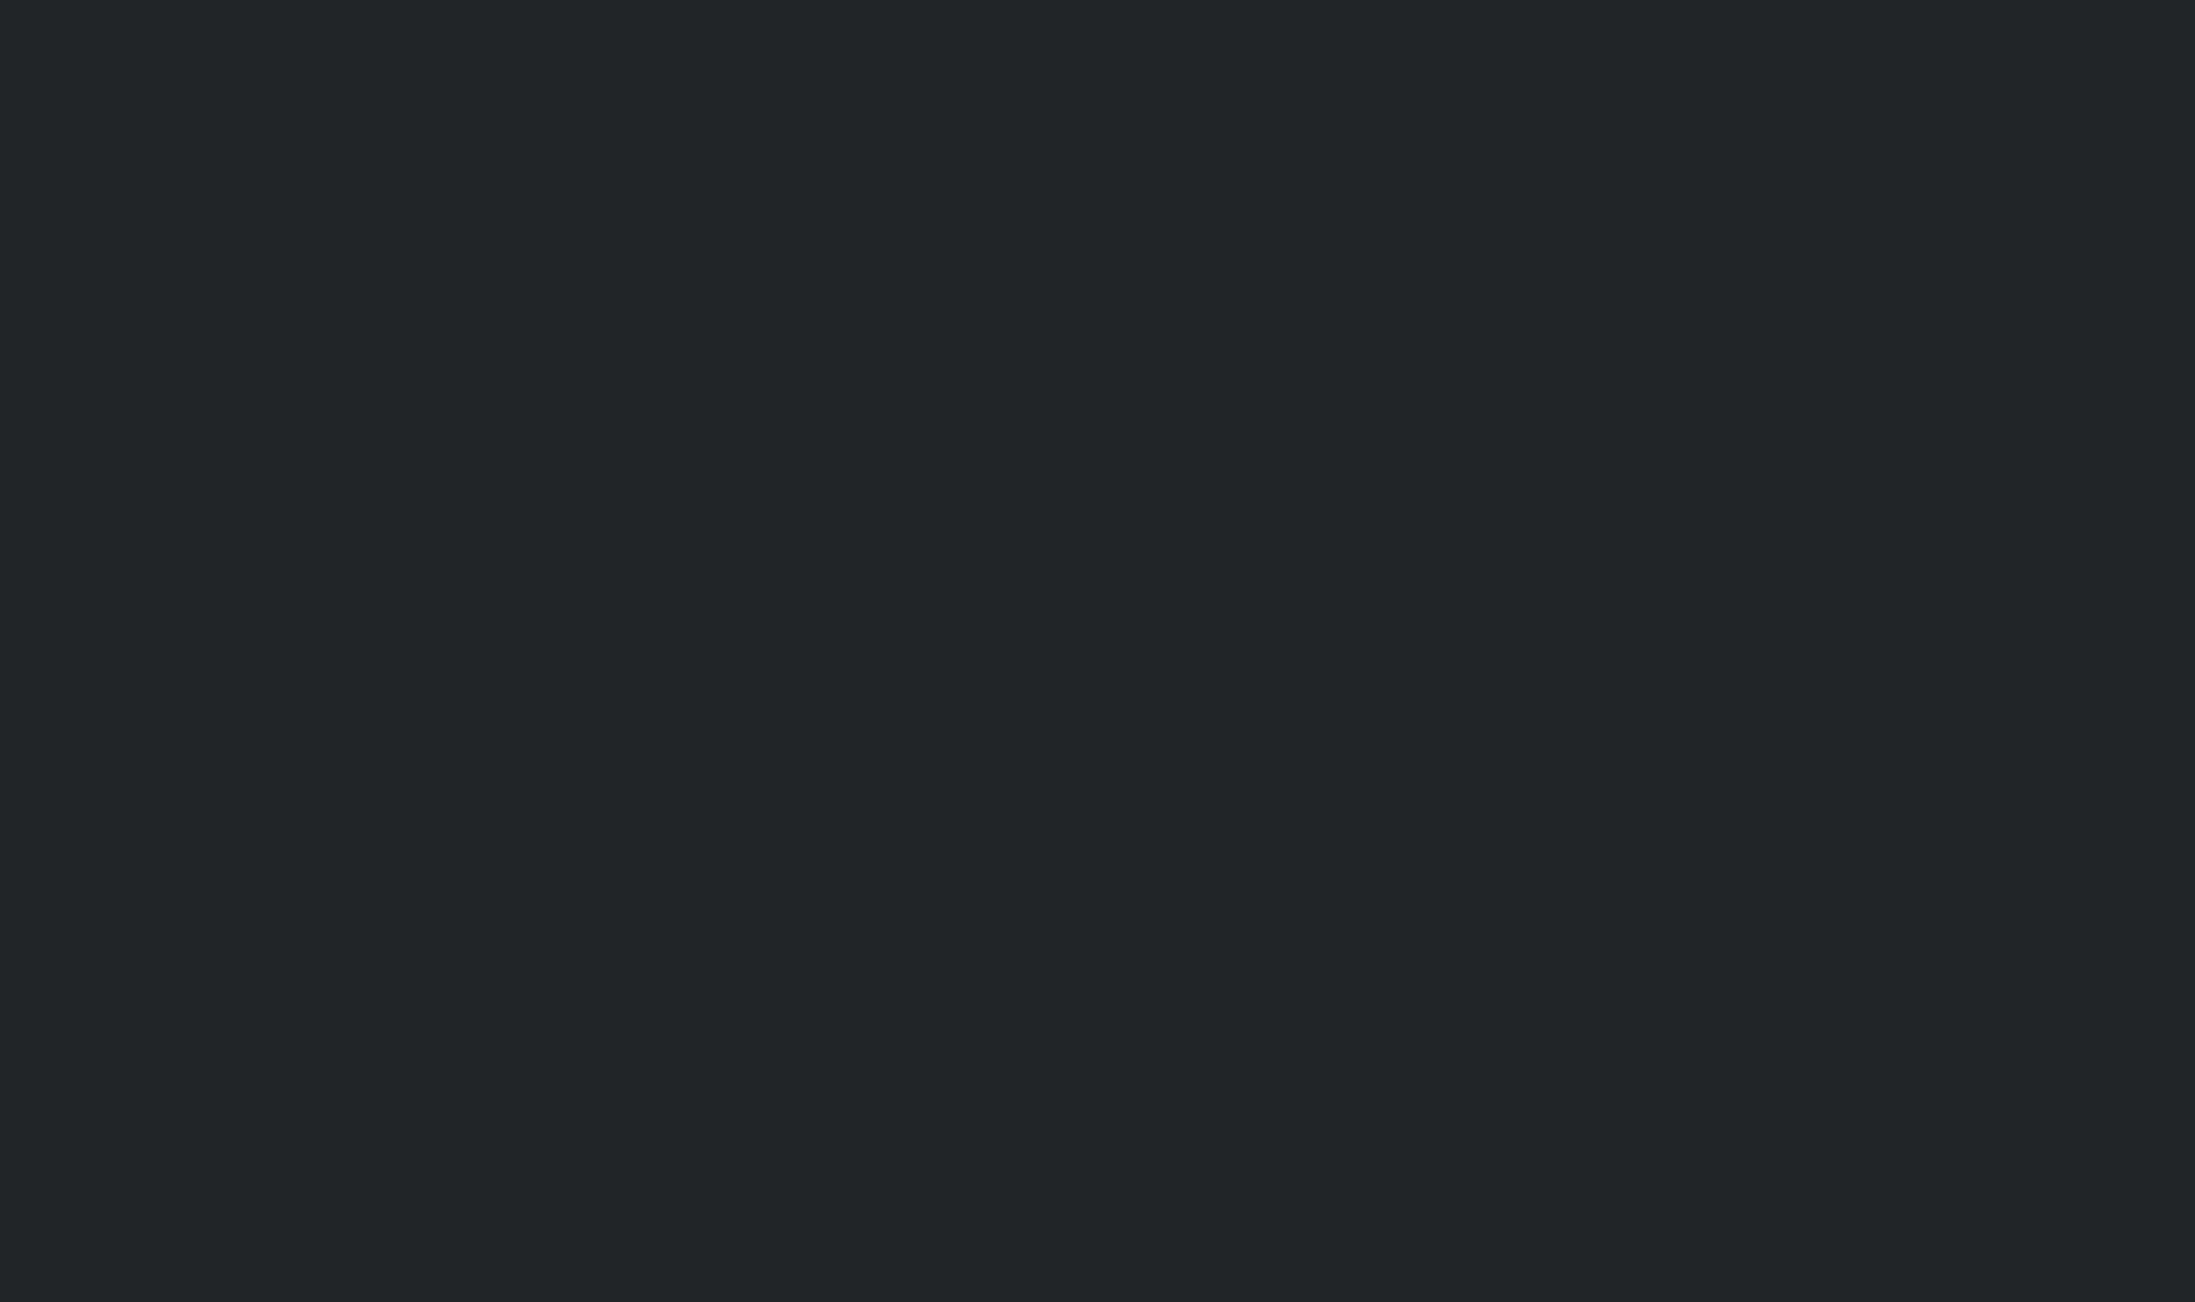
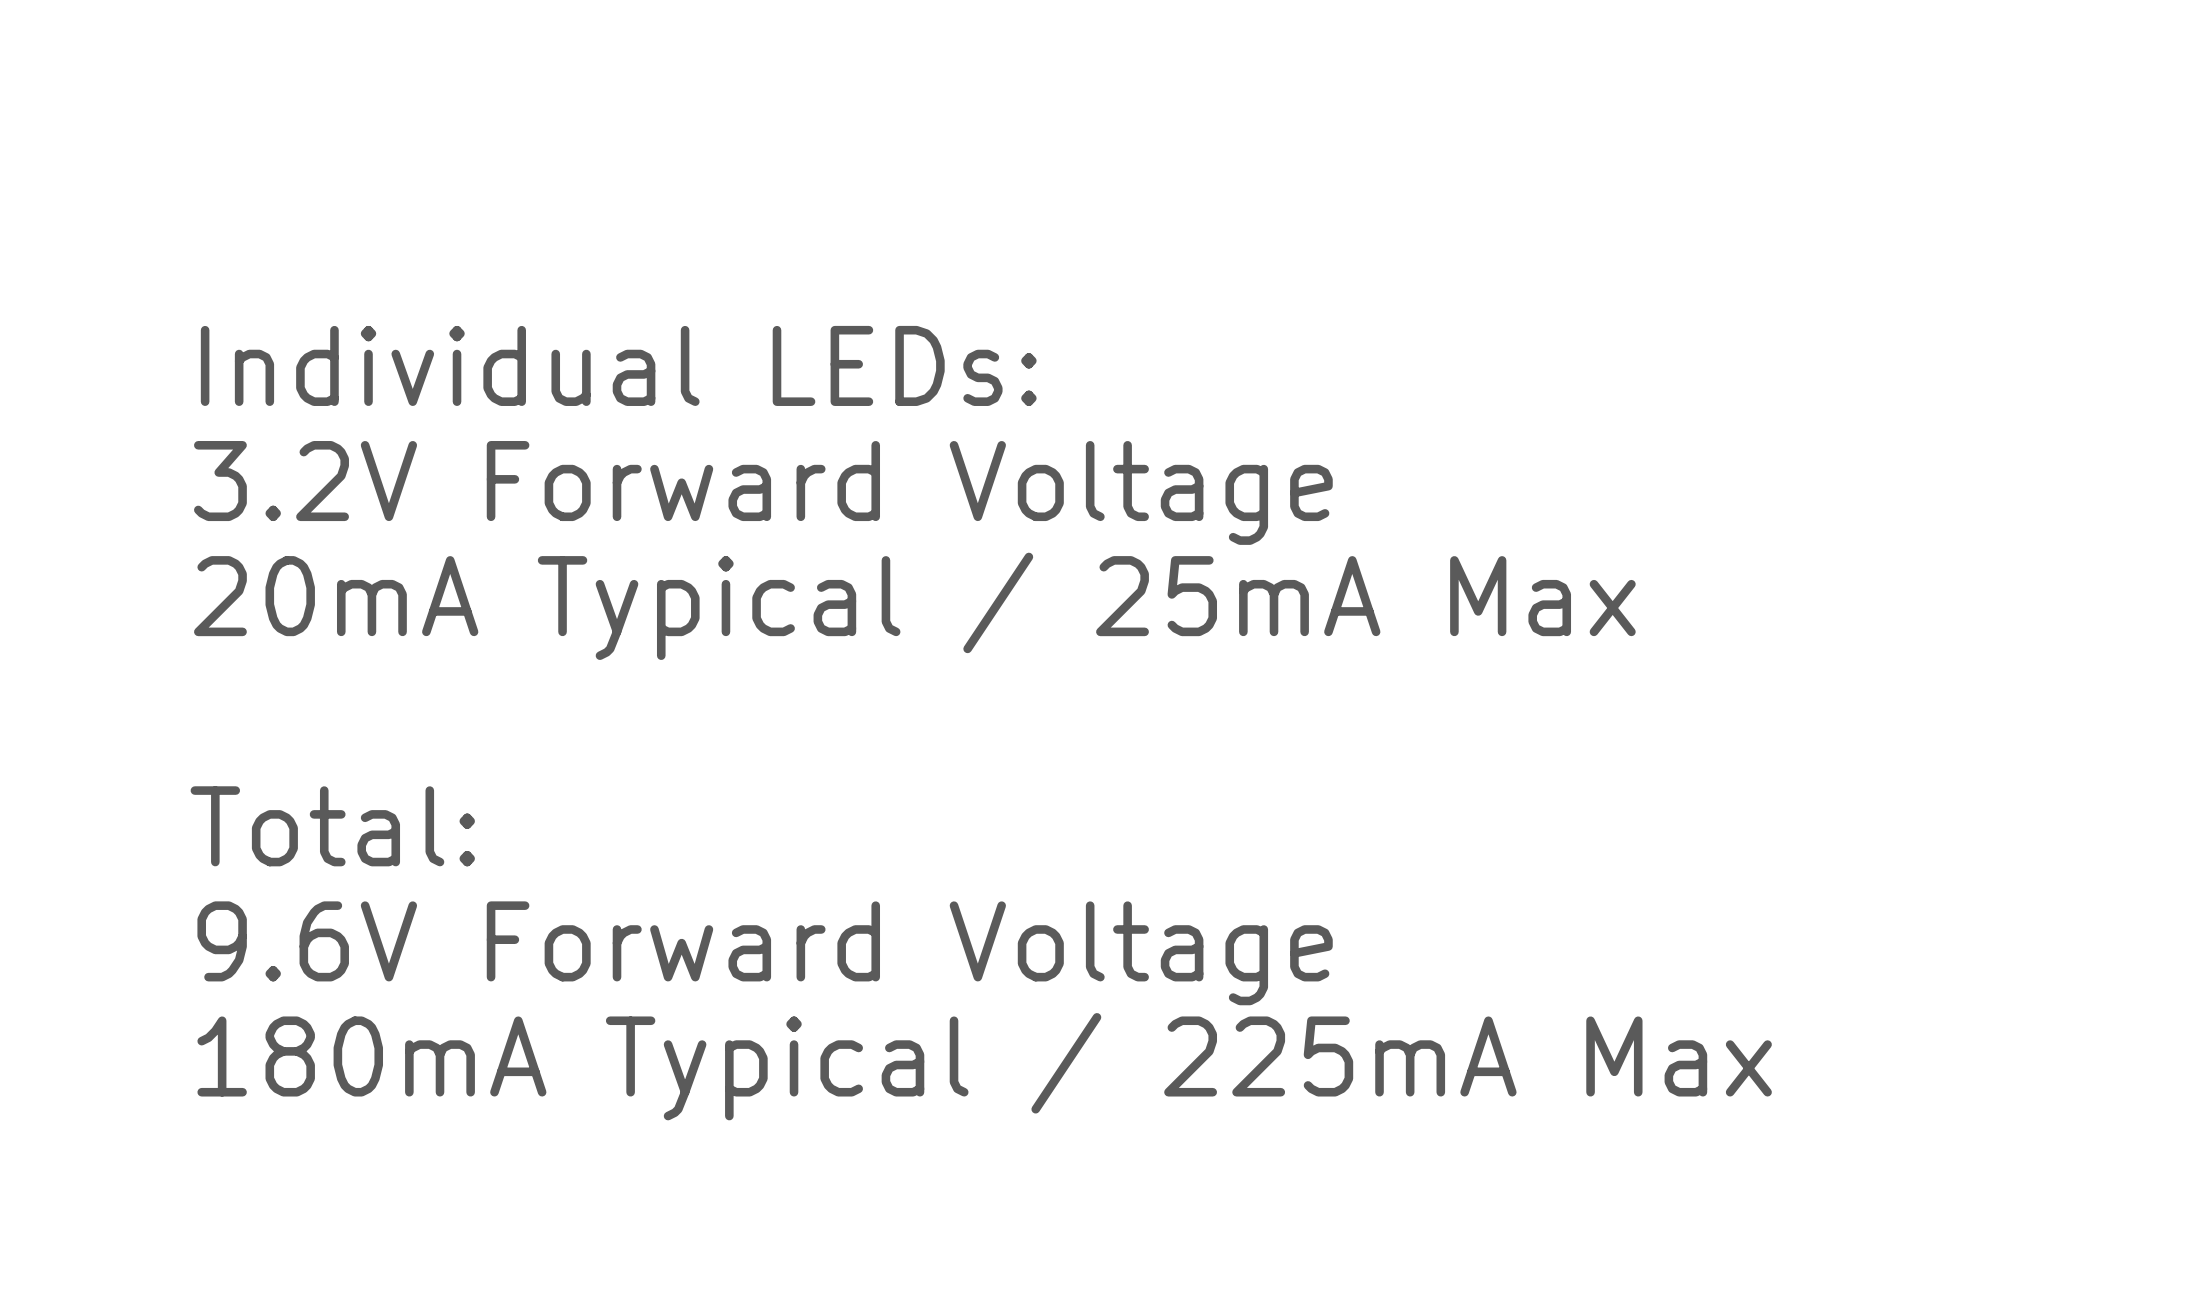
text: none -> Individual LEDs: (618, 365)
text: none -> 3.2V Forward Voltage (763, 492)
text: none -> 20mA Typical / 25mA Max (914, 606)
text: none -> Total: (332, 826)
text: none -> 9.6V Forward Voltage (765, 953)
text: none -> 180mA Typical / 225mA Max (984, 1066)

